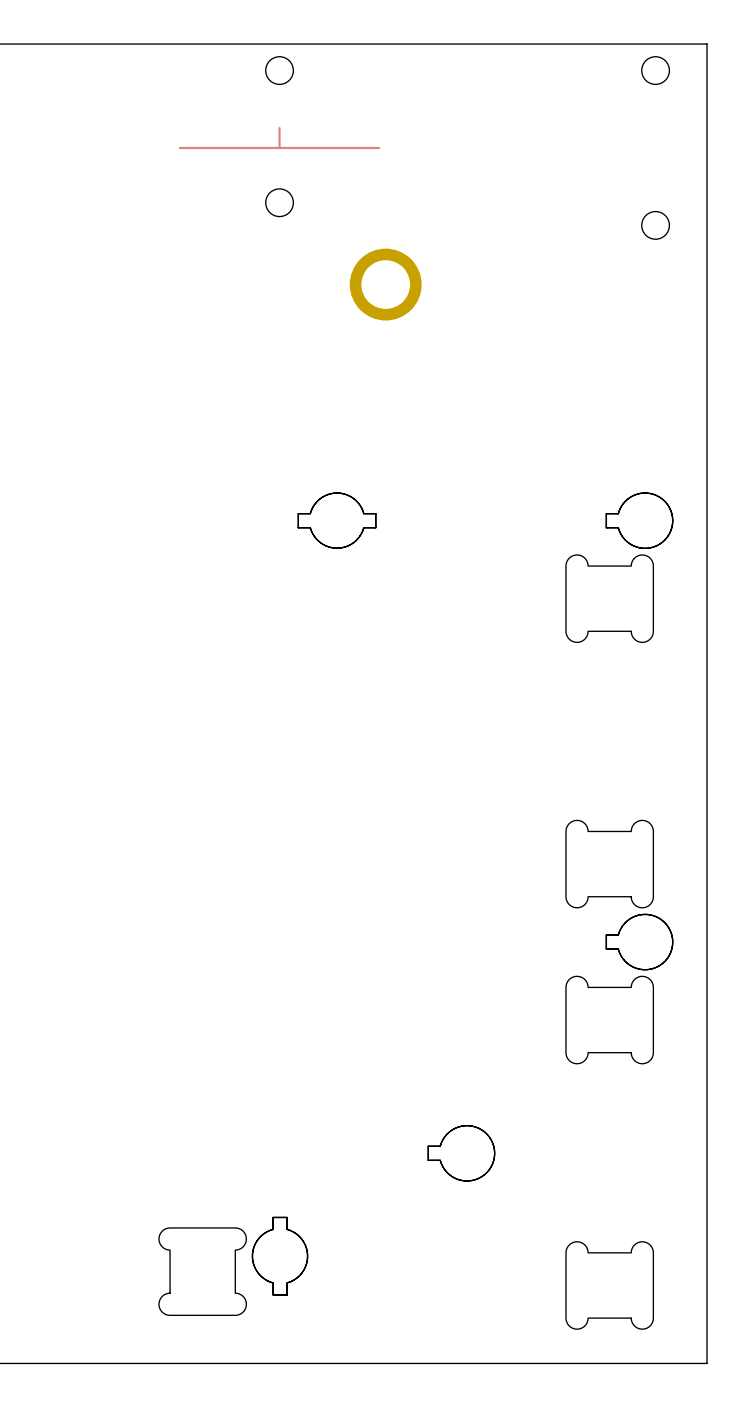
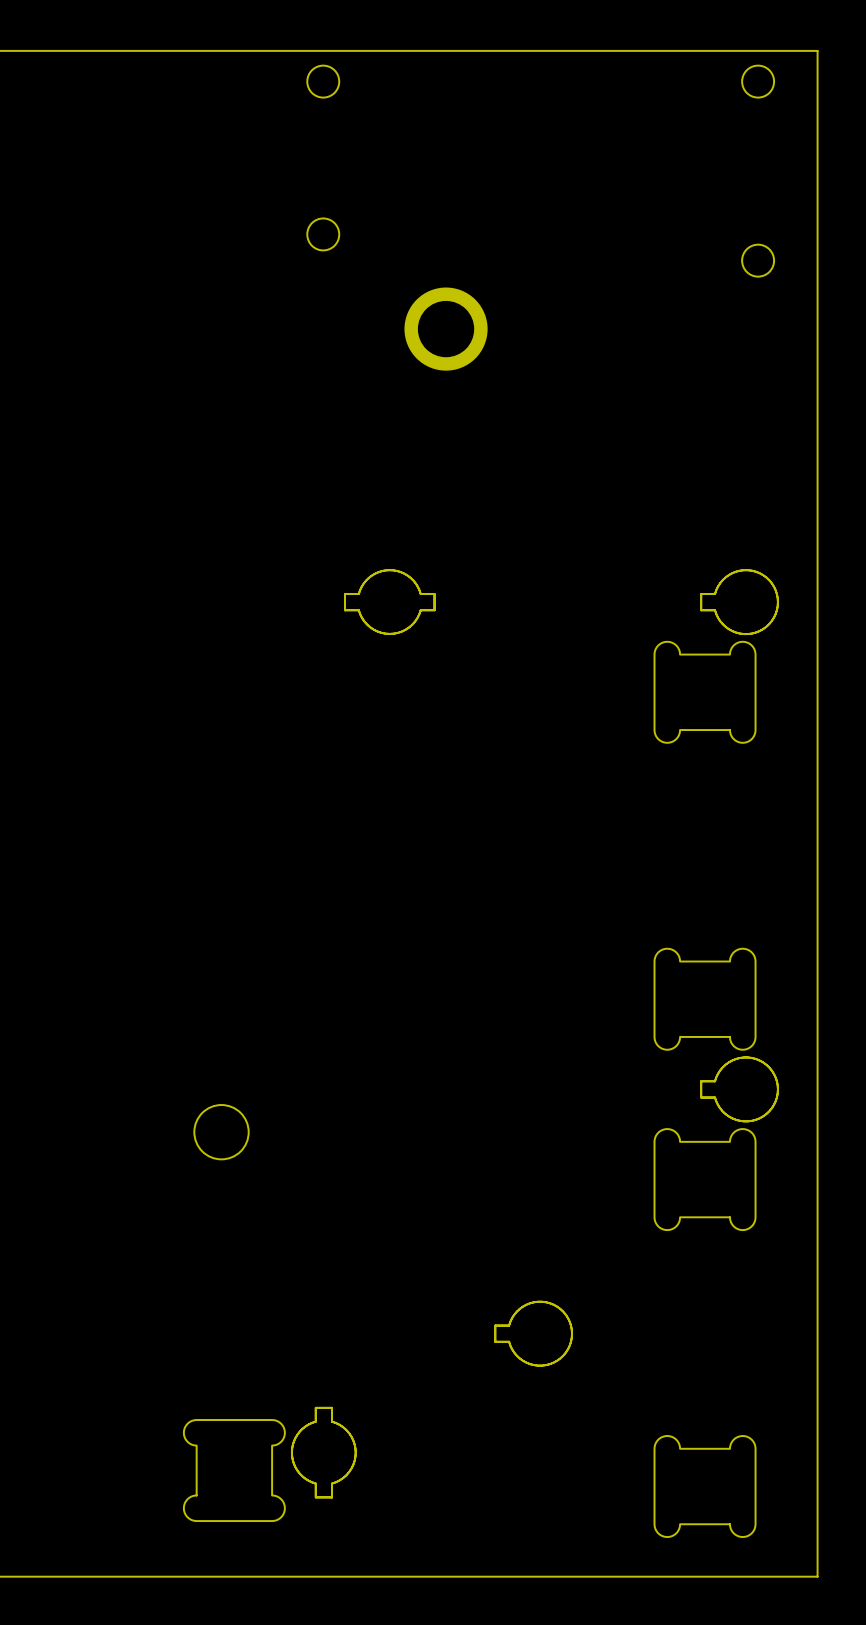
top track: (279, 128) (279, 147) -> none
top track: (179, 147) (379, 147) -> none
round board edge: none -> [193, 1104, 250, 1161]

